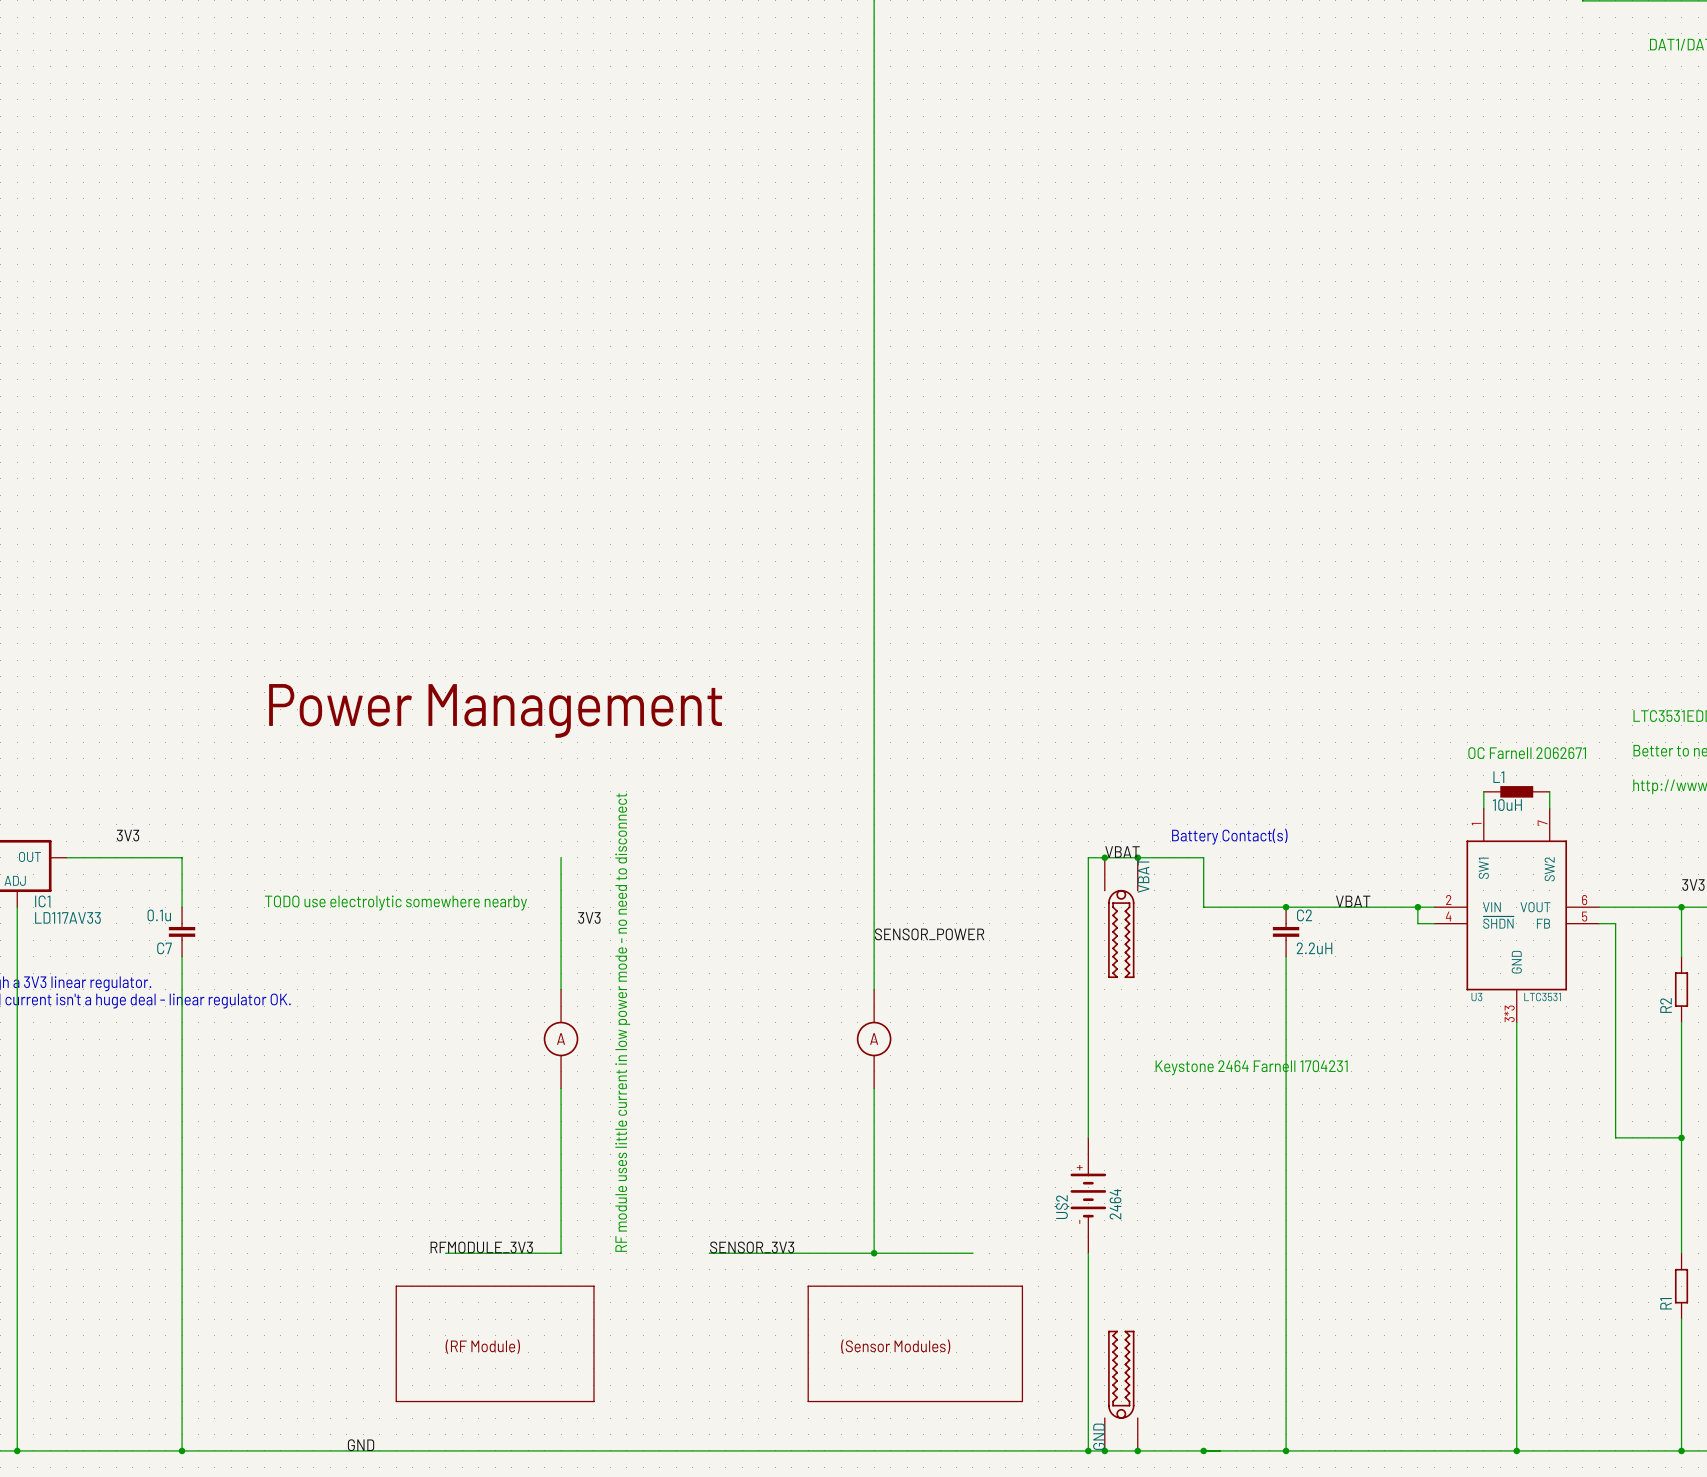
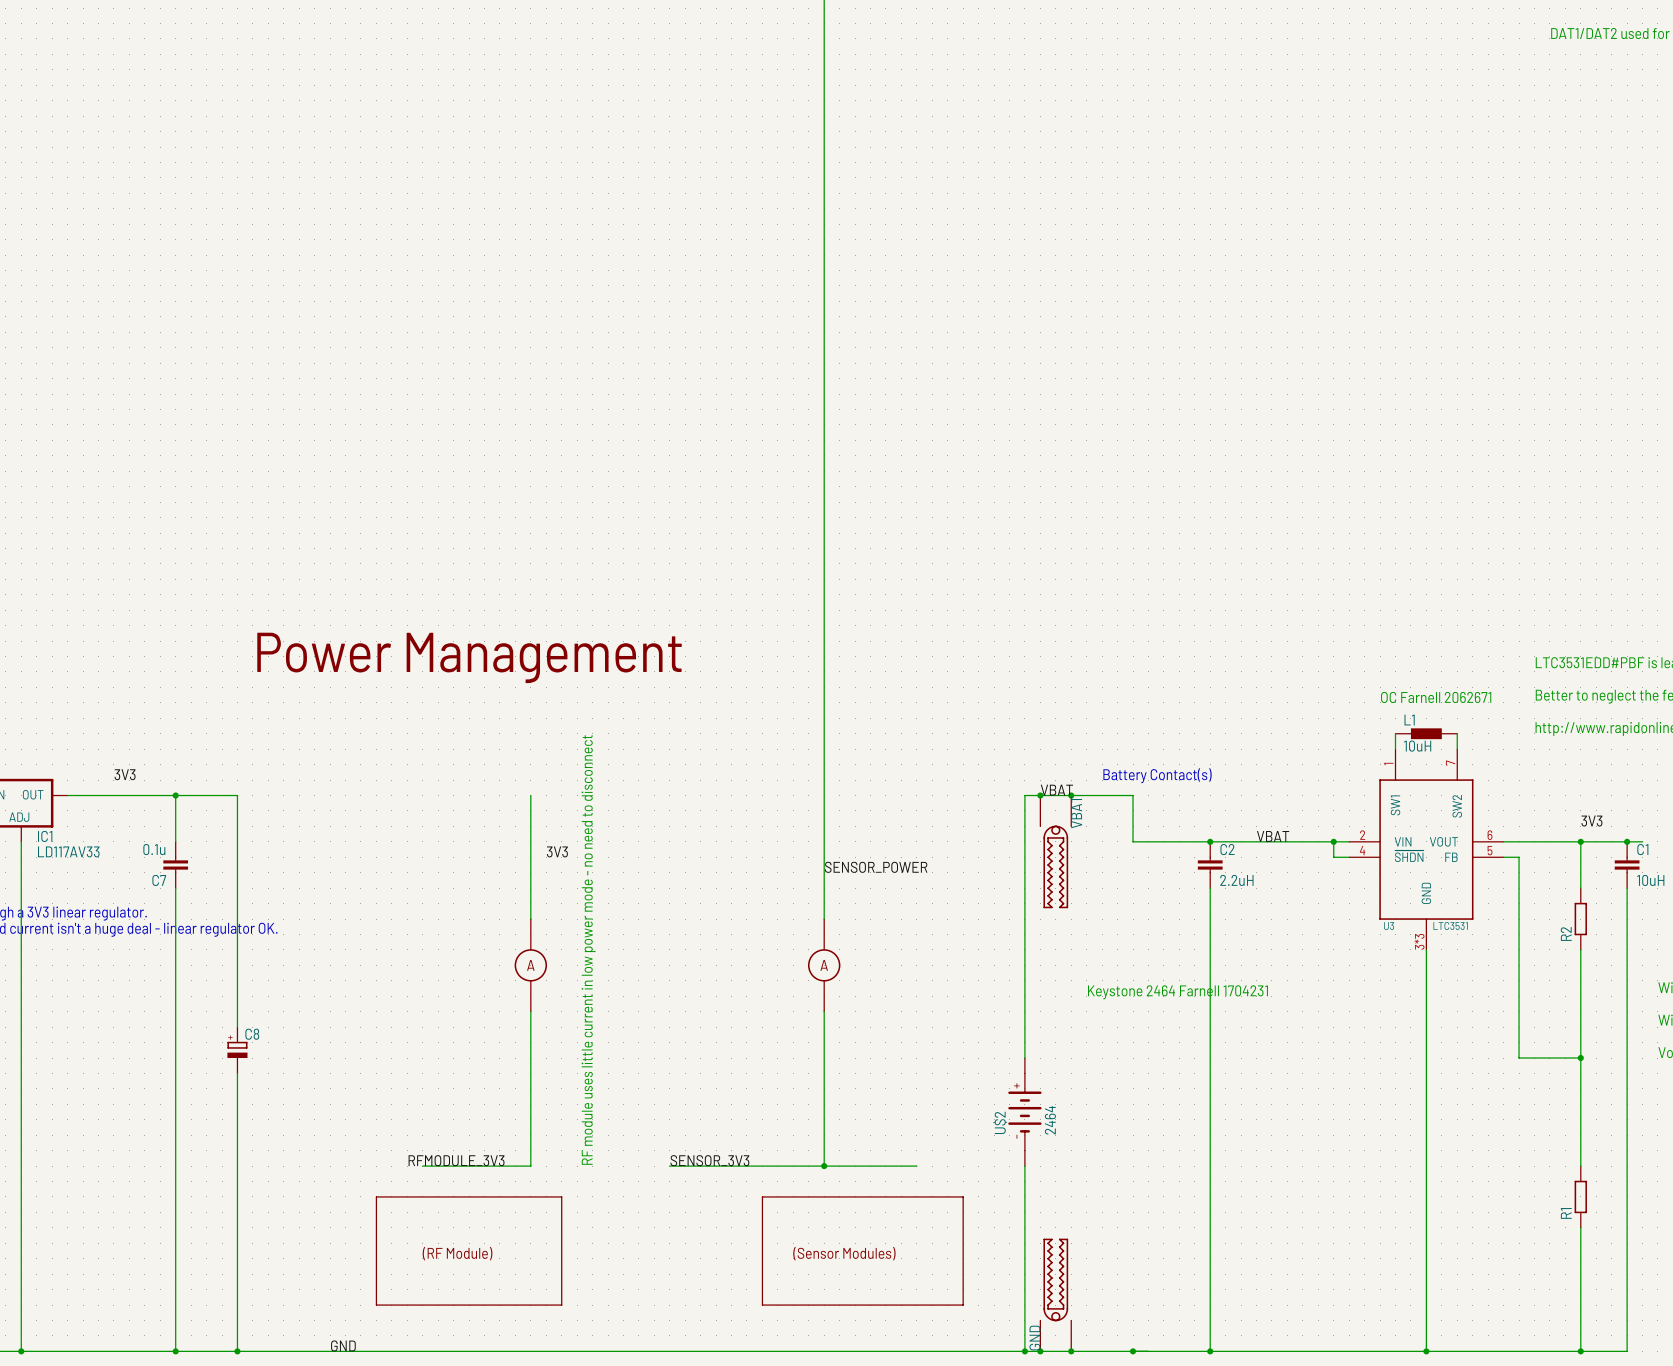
wire: none -> (175, 795) (237, 795) (237, 1027)
junction: none -> (175, 795)
text: TODO use electrolytic somewhere nearby (396, 902) -> none
C8: none -> (237, 1050)
wire: none -> (237, 1073) (237, 1351)
junction: none -> (237, 1351)

